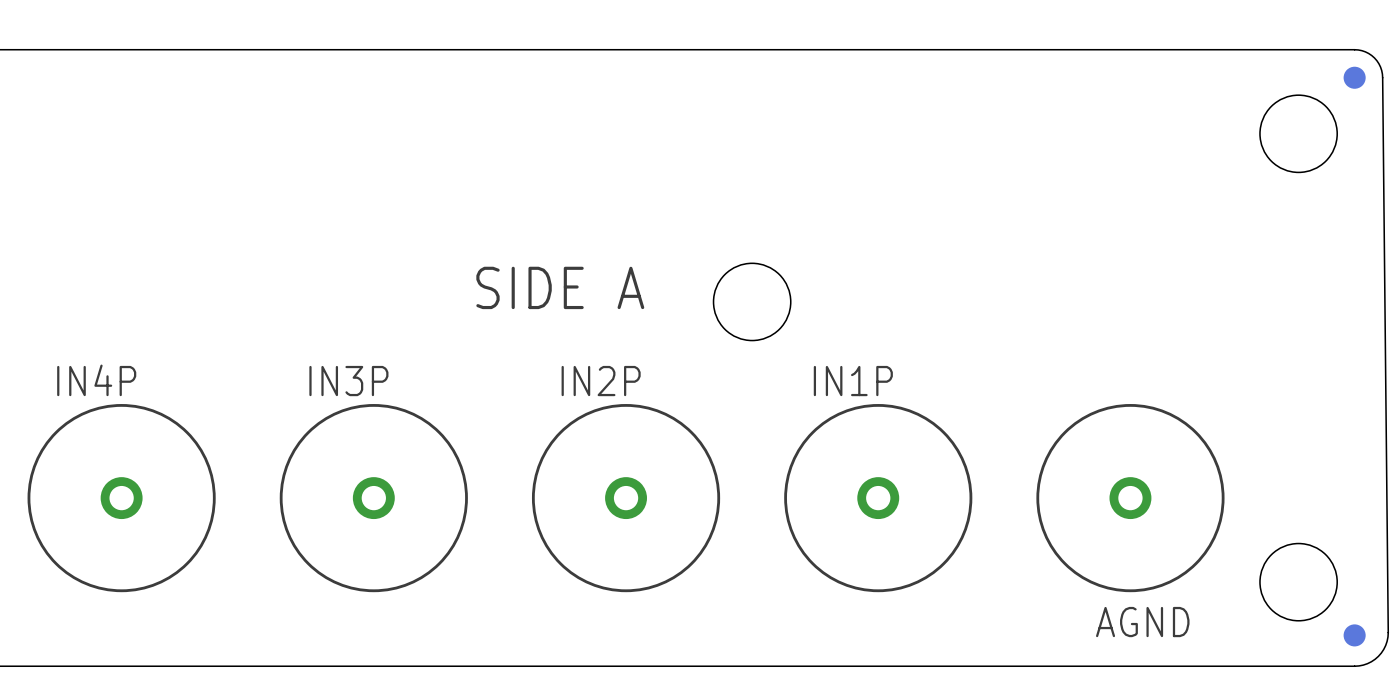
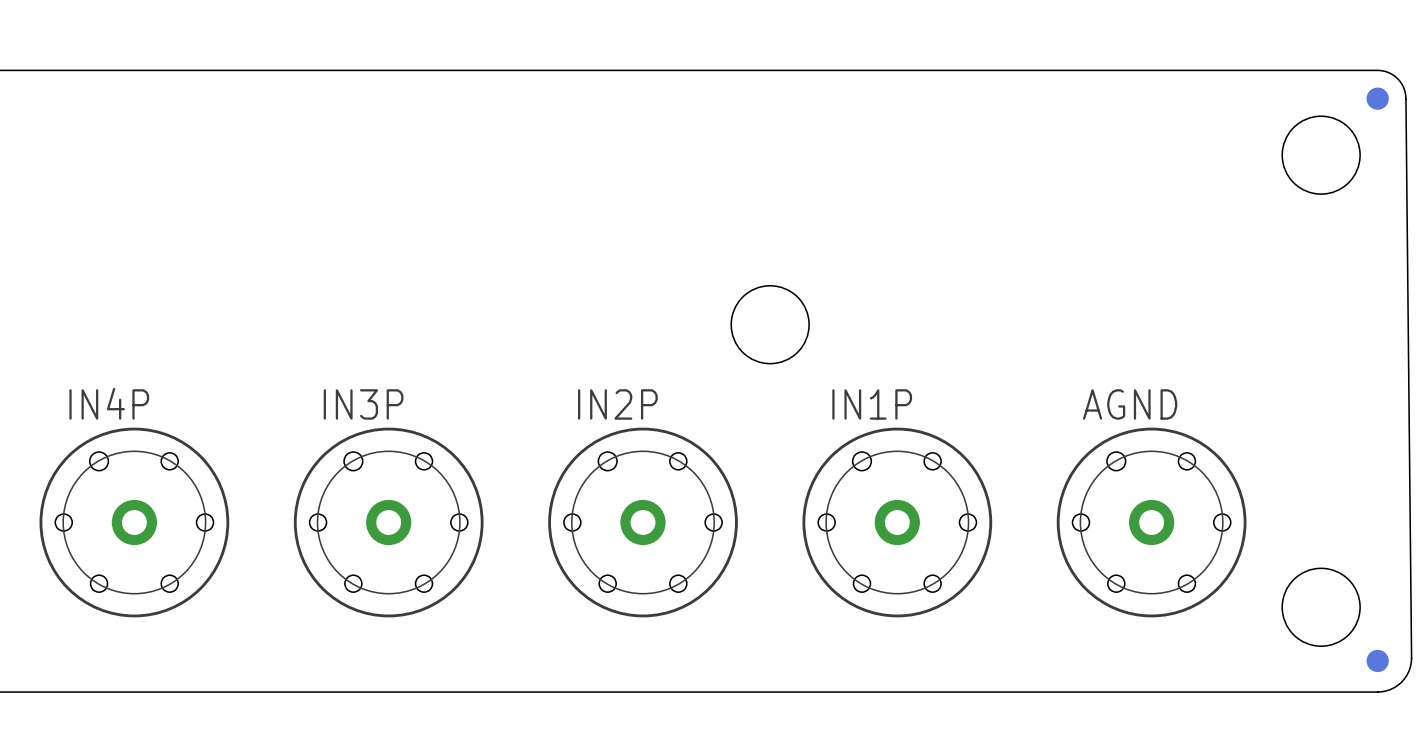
text: SIDE A (560, 287) -> none
IN4P footprint: [27, 404, 216, 593] -> [39, 427, 230, 618]
IN3P footprint: [279, 404, 468, 593] -> [293, 427, 484, 618]
IN2P footprint: [531, 404, 721, 593] -> [548, 427, 738, 618]
IN1P footprint: [784, 404, 973, 593] -> [802, 427, 993, 618]
AGND footprint: [1036, 404, 1225, 593] -> [1056, 427, 1247, 618]
AGND name position: AGND (1142, 622) -> AGND (1130, 404)

